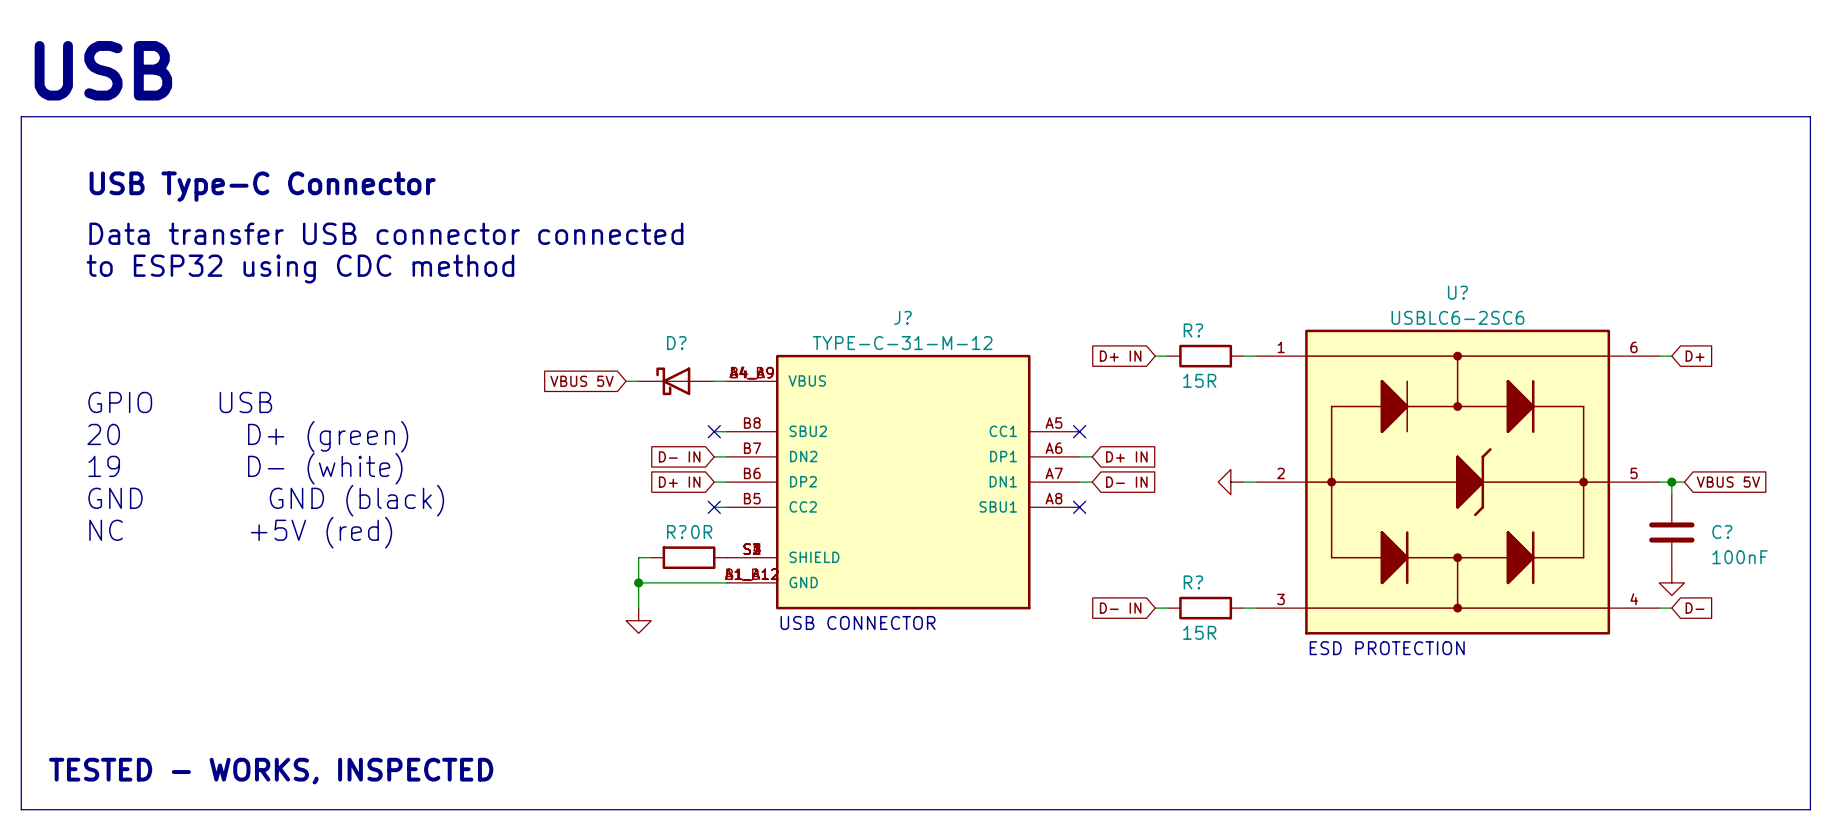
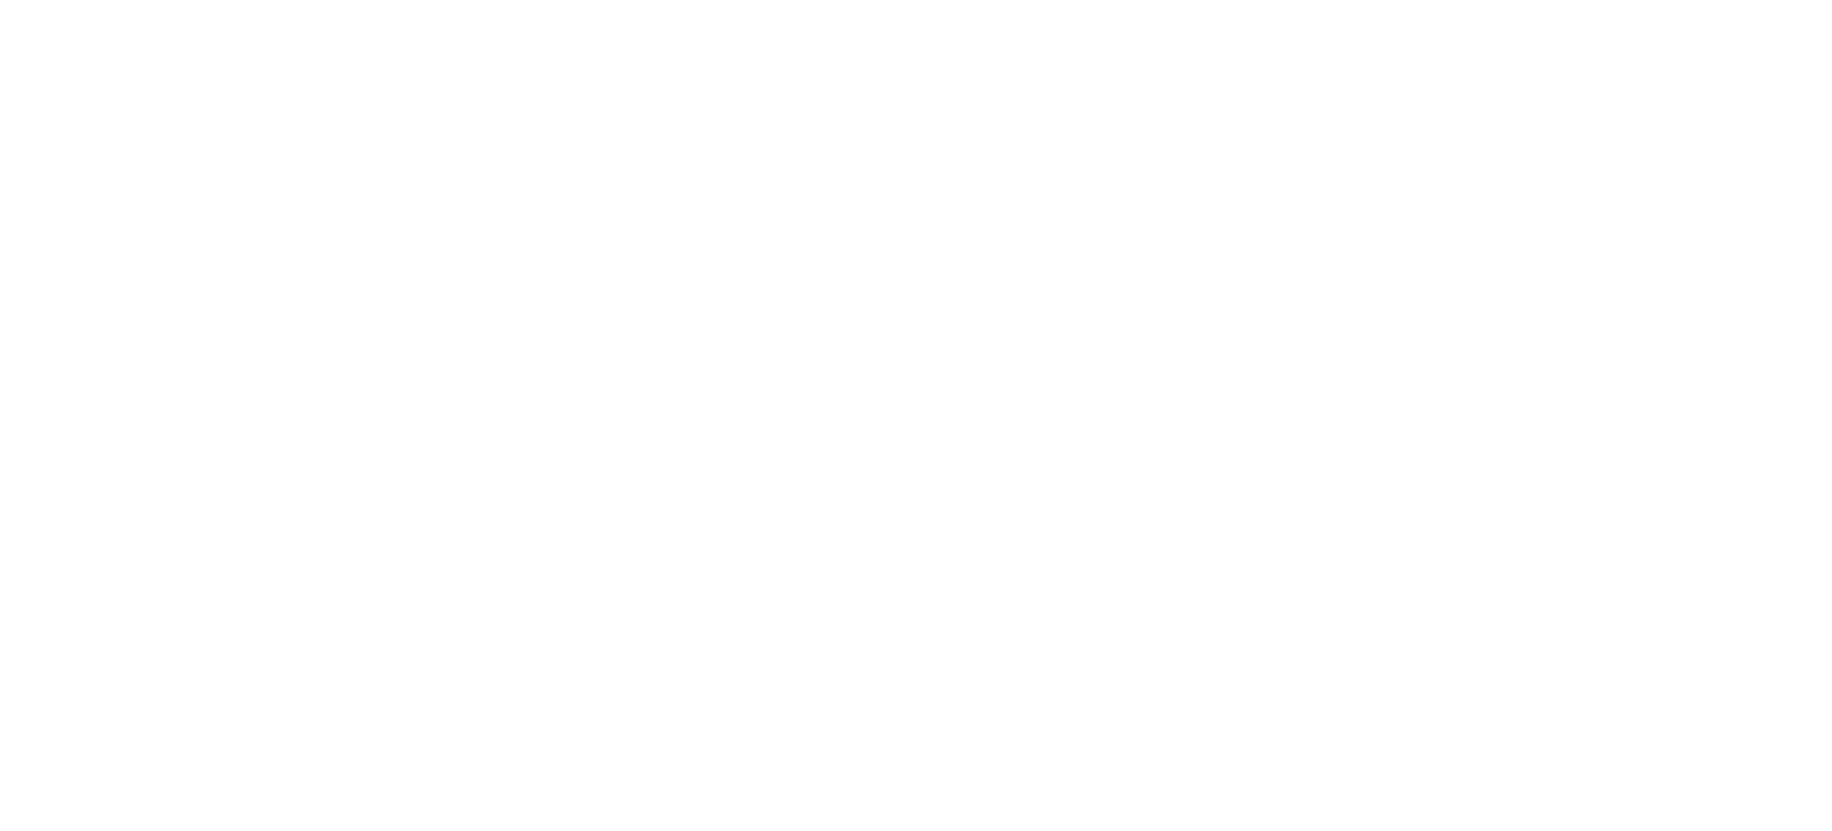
text: USB (103, 70) -> none
line: (21, 116) (1810, 116) (1810, 809) (21, 809) (21, 116) -> none
text: USB Type-C Connector (262, 186) -> none
text: Data transfer USB connector connected (386, 233) -> none
text: to ESP32 using CDC method (300, 268) -> none
global label: D+ IN (1120, 356) -> none
wire: (1155, 356) (1167, 356) -> none
R?: 15R (1205, 356) -> none
wire: (1243, 356) (1256, 356) -> none
wire: (1659, 356) (1671, 356) -> none
global label: D+ (1695, 356) -> none
global label: VBUS 5V (582, 381) -> none
wire: (626, 381) (638, 381) -> none
D?: (676, 381) -> none
wire: (714, 381) (726, 381) -> none
text: GPIO USB (180, 402) -> none
wire: (714, 431) (726, 431) -> none
no-connect mark: (714, 431) -> none
no-connect mark: (1079, 431) -> none
text: 20 D+ (green) (247, 436) -> none
global label: D- IN (679, 456) -> none
wire: (714, 456) (726, 456) -> none
wire: (1079, 456) (1092, 456) -> none
global label: D+ IN (1126, 456) -> none
text: 19 D- (white) (245, 468) -> none
global label: D+ IN (679, 482) -> none
wire: (714, 482) (726, 482) -> none
J?: TYPE-C-31-M-12 (903, 482) -> none
wire: (1079, 482) (1092, 482) -> none
global label: D- IN (1126, 482) -> none
power symbol: (1230, 482) -> none
wire: (1243, 482) (1256, 482) -> none
U?: USBLC6-2SC6 (1457, 482) -> none
wire: (1659, 482) (1684, 482) -> none
wire: (1671, 482) (1671, 494) -> none
junction: (1671, 482) -> none
global label: VBUS 5V (1728, 482) -> none
text: GND GND (black) (266, 500) -> none
wire: (714, 507) (726, 507) -> none
no-connect mark: (714, 507) -> none
no-connect mark: (1079, 507) -> none
text: NC +5V (red) (240, 532) -> none
C?: 100nF (1671, 532) -> none
wire: (651, 557) (638, 557) (638, 608) -> none
R?: 0R (689, 557) -> none
wire: (638, 582) (726, 582) -> none
junction: (638, 582) -> none
power symbol: (1671, 582) -> none
global label: D- IN (1120, 608) -> none
wire: (1155, 608) (1167, 608) -> none
R?: 15R (1205, 608) -> none
wire: (1243, 608) (1256, 608) -> none
wire: (1659, 608) (1671, 608) -> none
global label: D- (1695, 608) -> none
power symbol: (638, 620) -> none
text: USB CONNECTOR (858, 622) -> none
text: ESD PROTECTION (1387, 648) -> none
text: TESTED - WORKS, INSPECTED (271, 771) -> none

